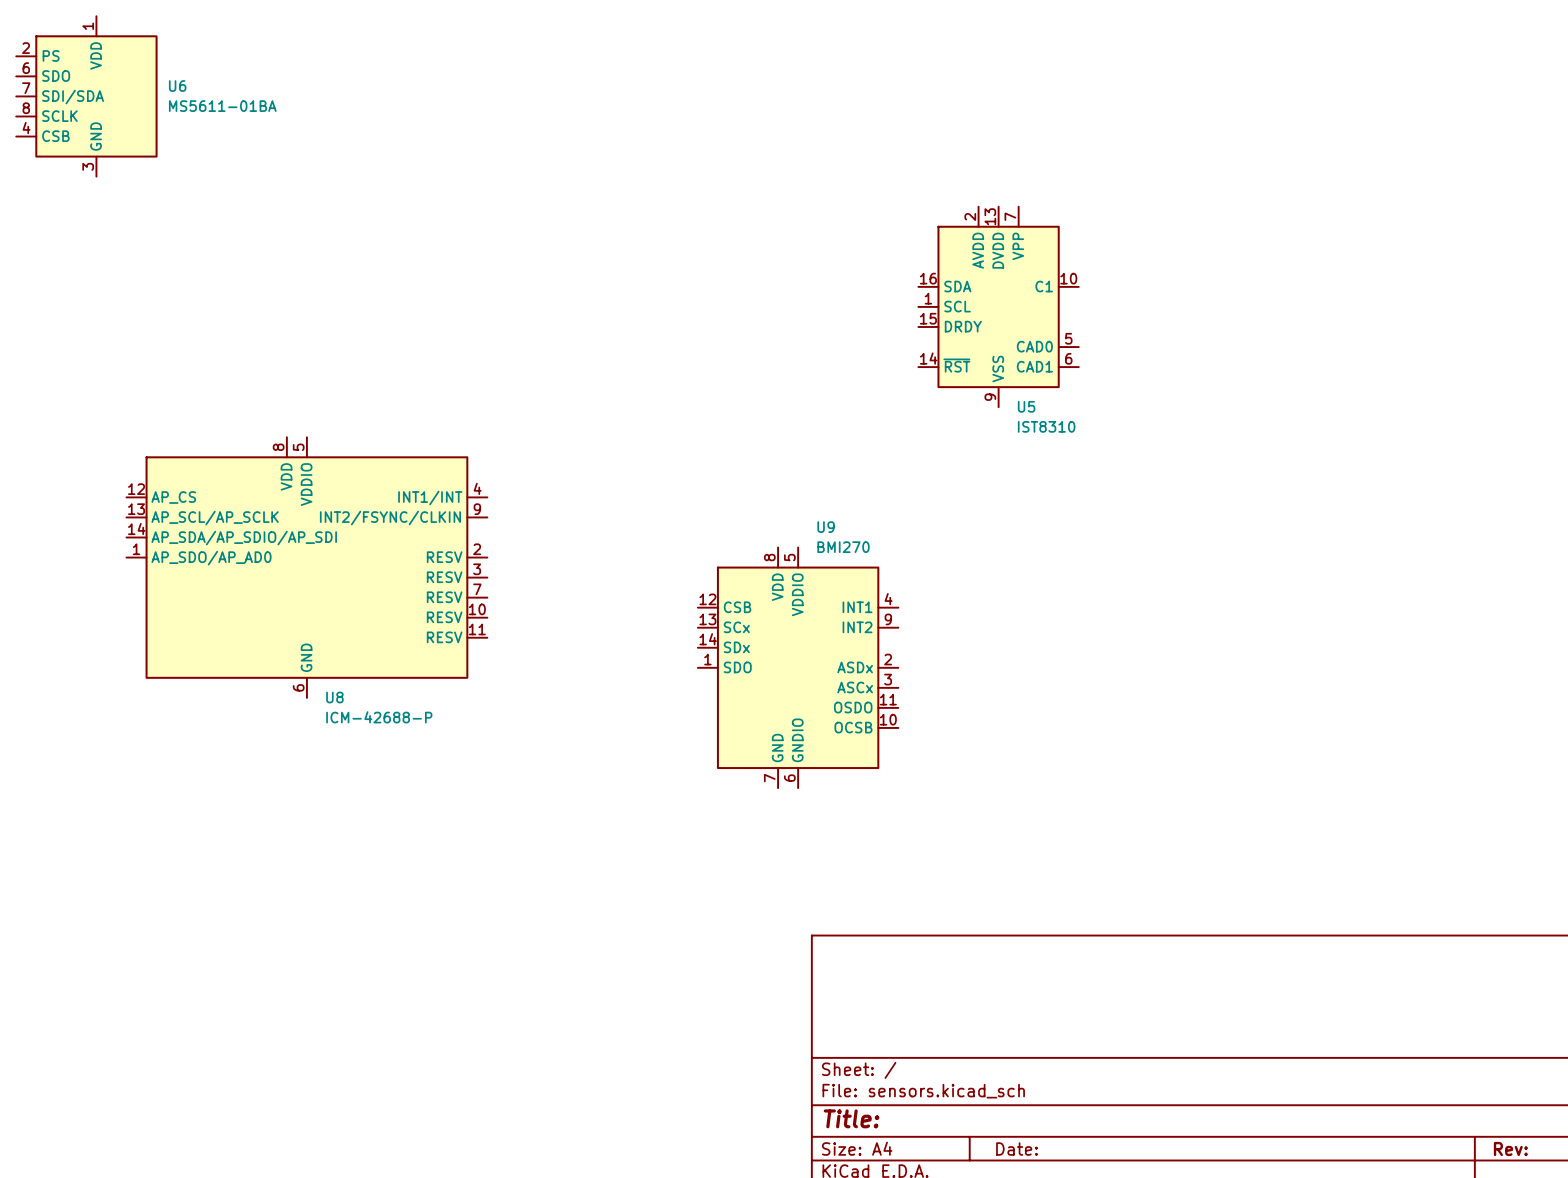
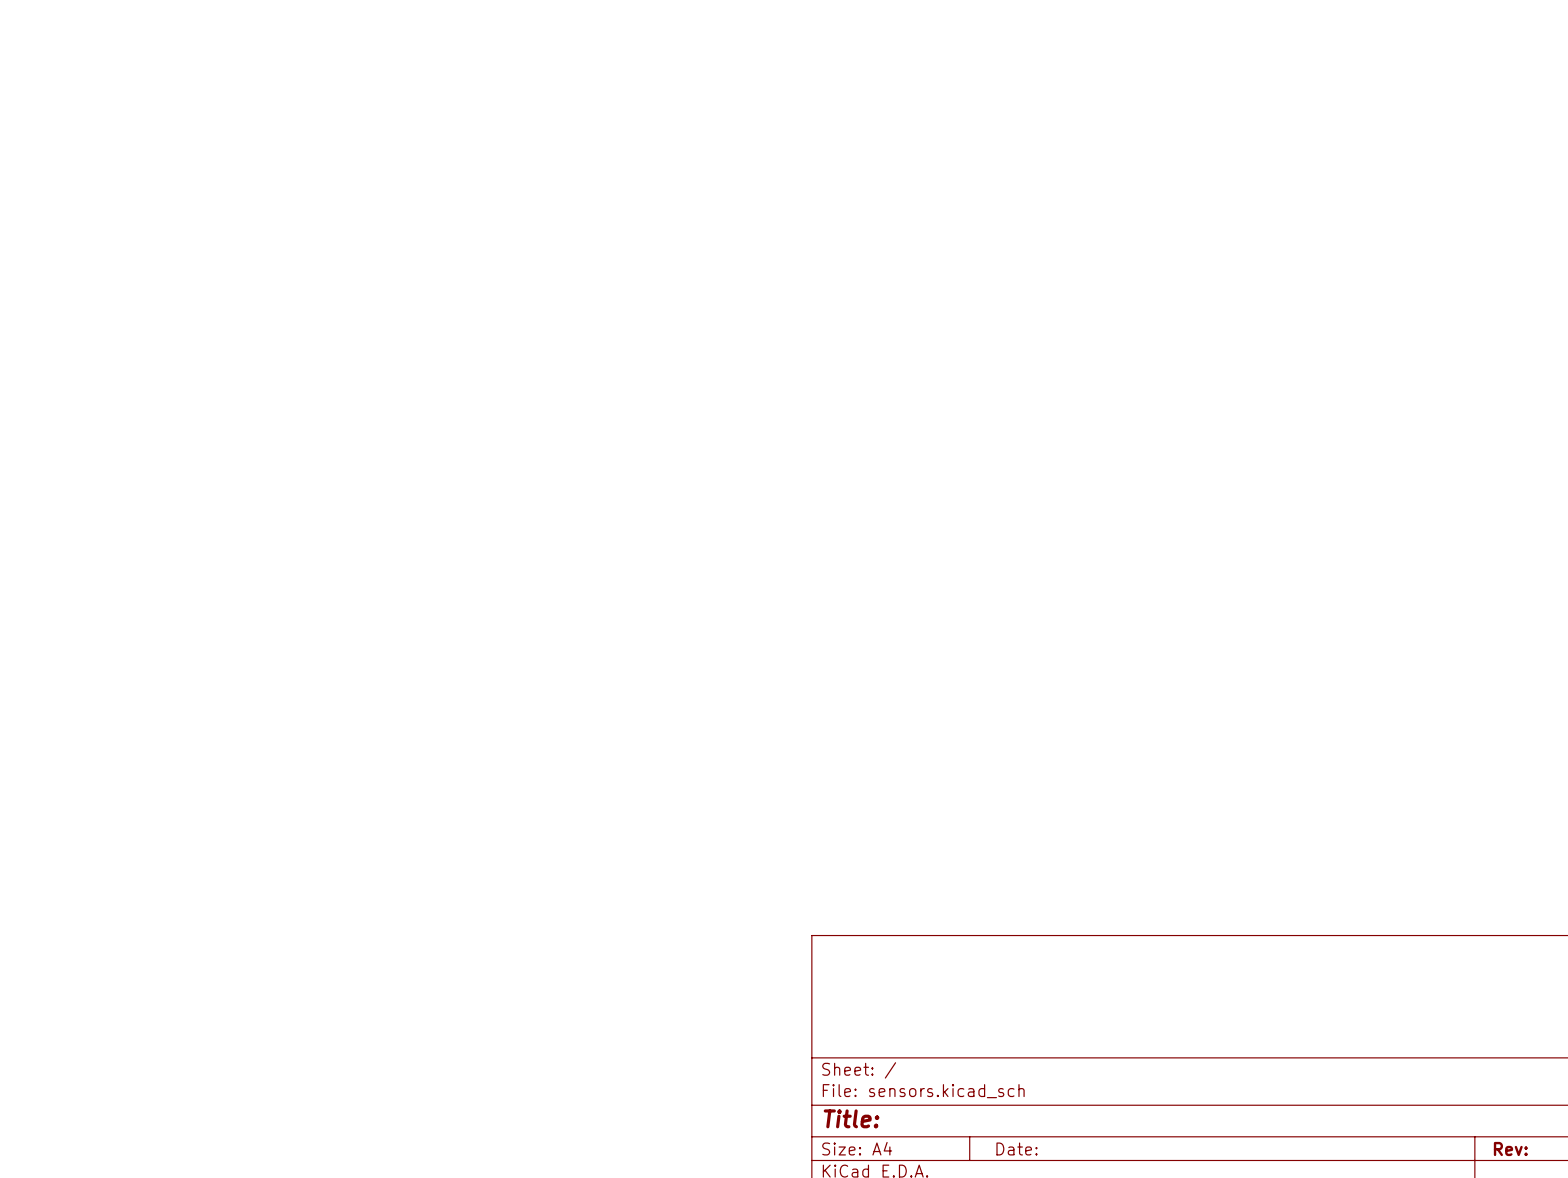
U6: MS5611-01BA (86, 96) -> none
U5: IST8310 (998, 306) -> none
U8: ICM-42688-P (306, 567) -> none
U9: BMI270 (798, 667) -> none

